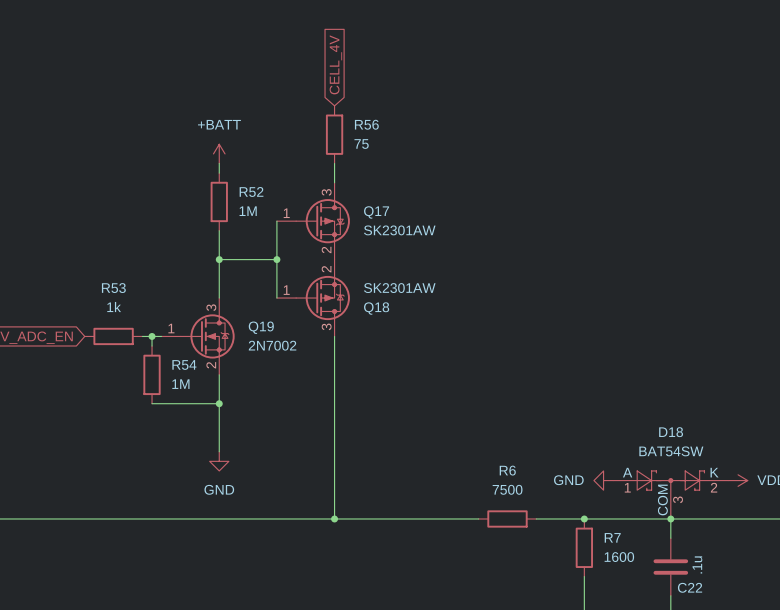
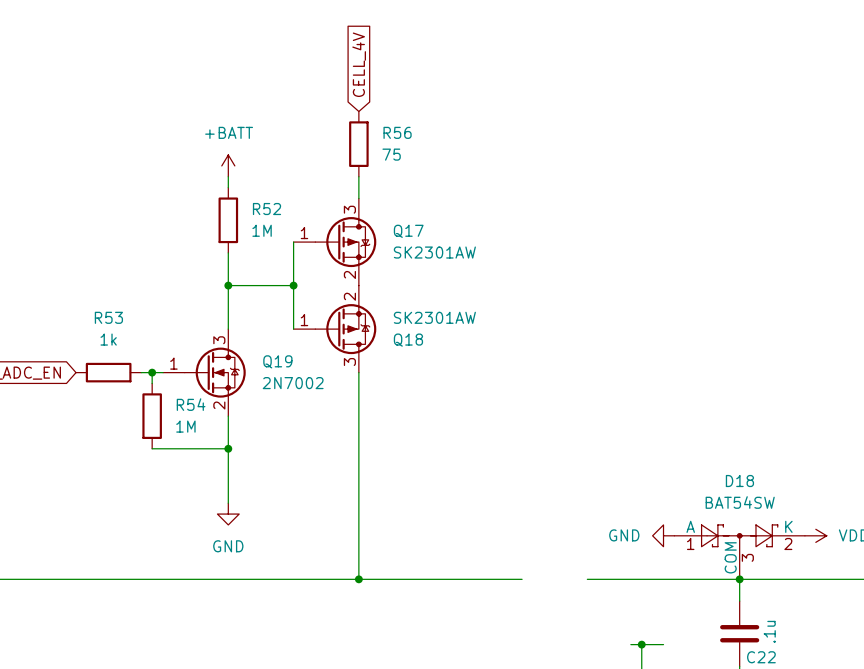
R6: 7500 (507, 518) -> none
junction: (584, 518) -> none
R7: 1600 (584, 547) -> none
wire: none -> (630, 644) (663, 644)
junction: none -> (641, 644)

